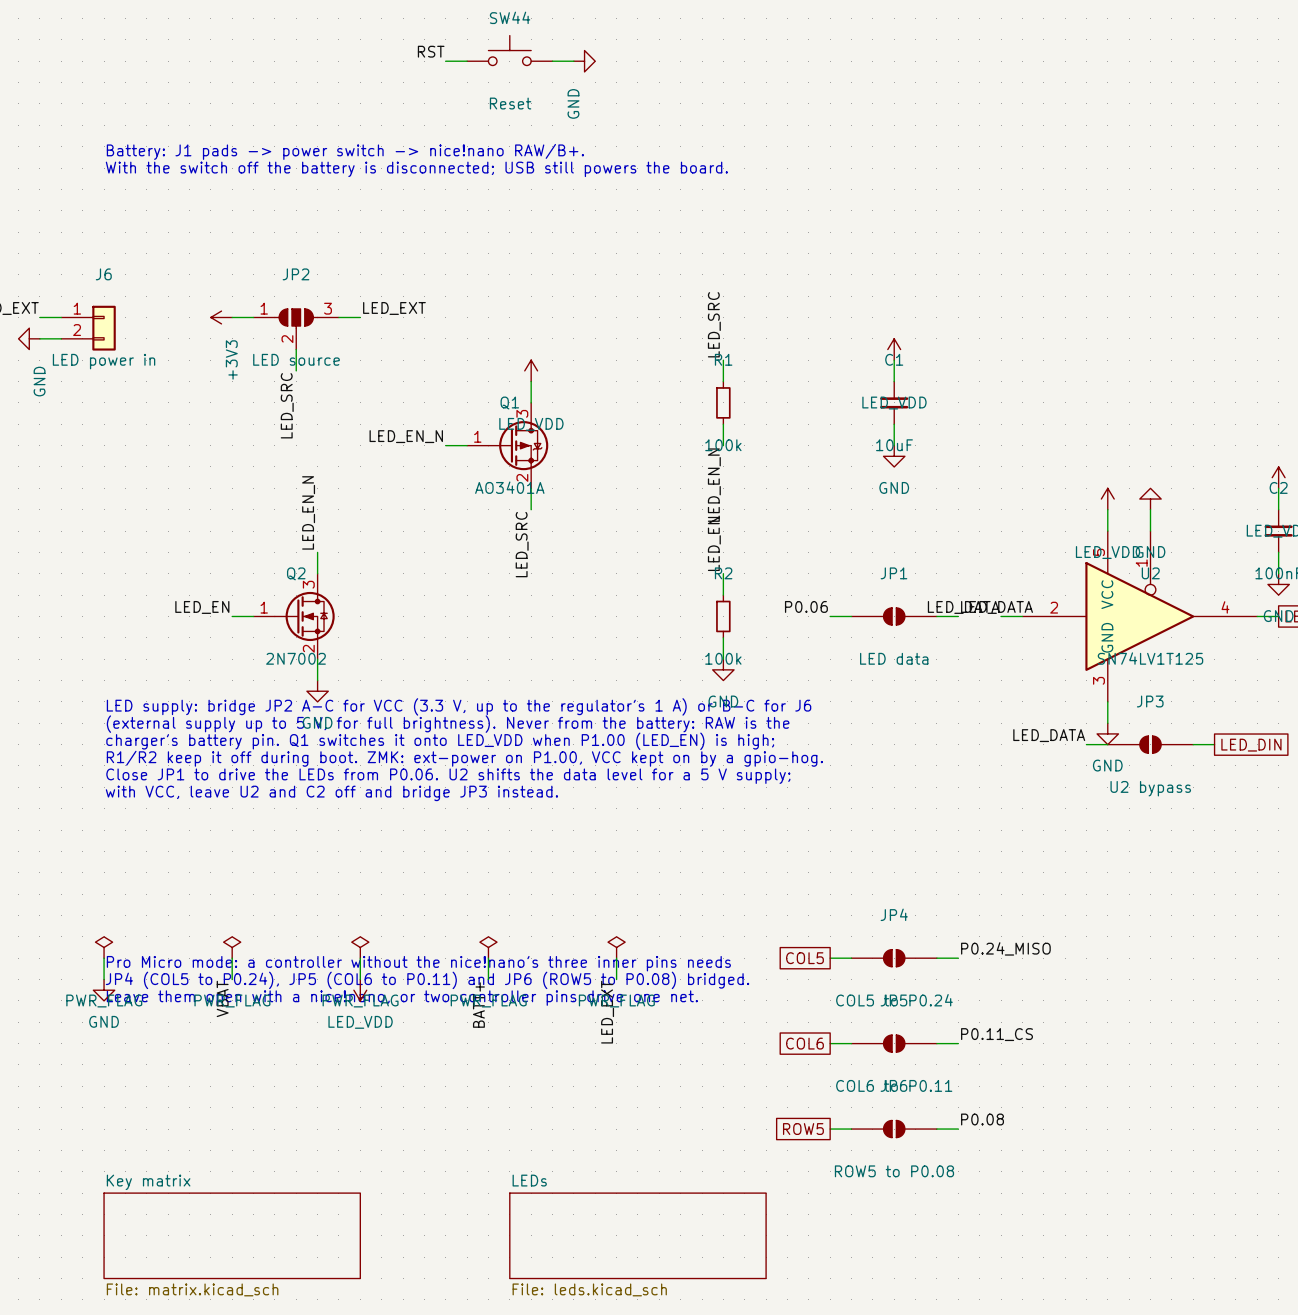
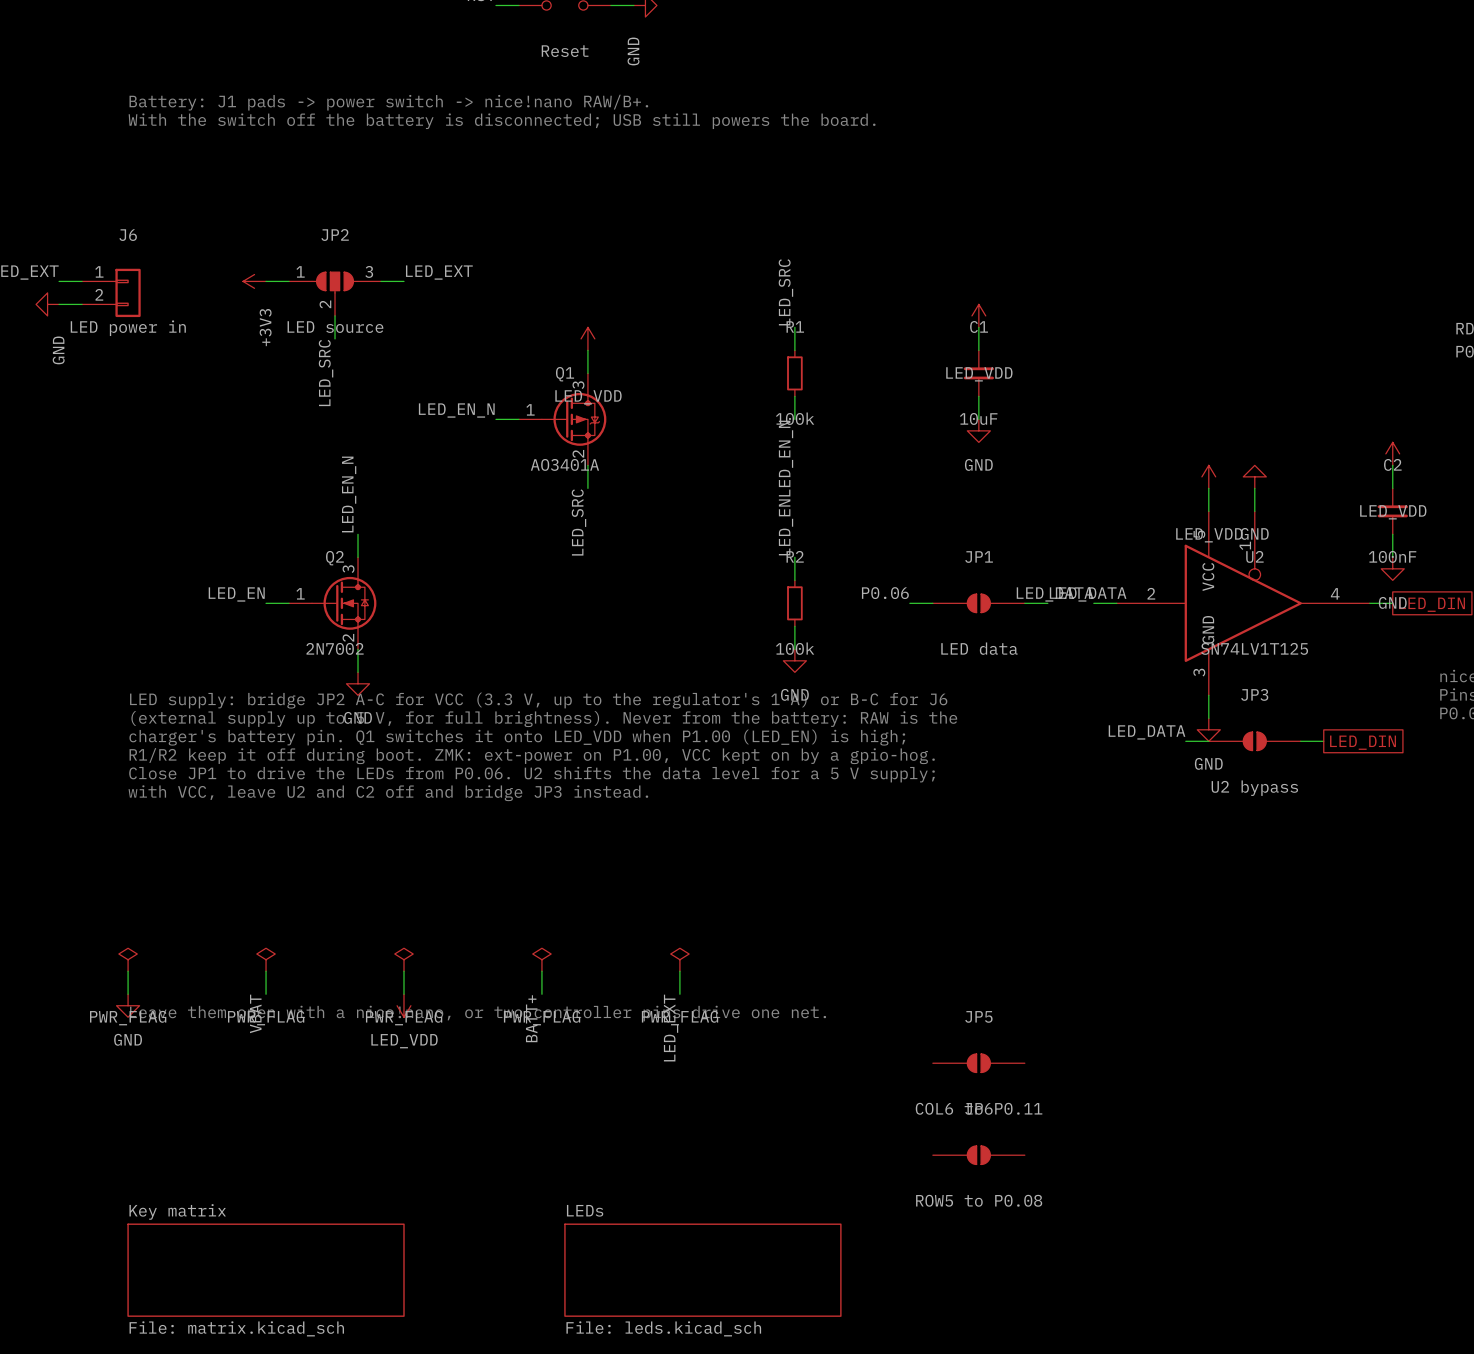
label: P0.24_MISO (1005, 948) -> none
global label: COL5 (804, 958) -> none
wire: (830, 958) (851, 958) -> none
JP4: COL5 to P0.24 (894, 958) -> none
wire: (936, 958) (958, 958) -> none
text: Pro Micro mode: a controller without the nice!nano's three inner pins needs (418, 963) -> none
text: JP4 (COL5 to P0.24), JP5 (COL6 to P0.11) and JP6 (ROW5 to P0.08) bridged. (427, 980) -> none
label: P0.11_CS (997, 1034) -> none
global label: COL6 (804, 1043) -> none
wire: (830, 1043) (851, 1043) -> none
wire: (936, 1043) (958, 1043) -> none
label: P0.08 (982, 1119) -> none
global label: ROW5 (803, 1129) -> none
wire: (830, 1129) (851, 1129) -> none
wire: (936, 1129) (958, 1129) -> none

